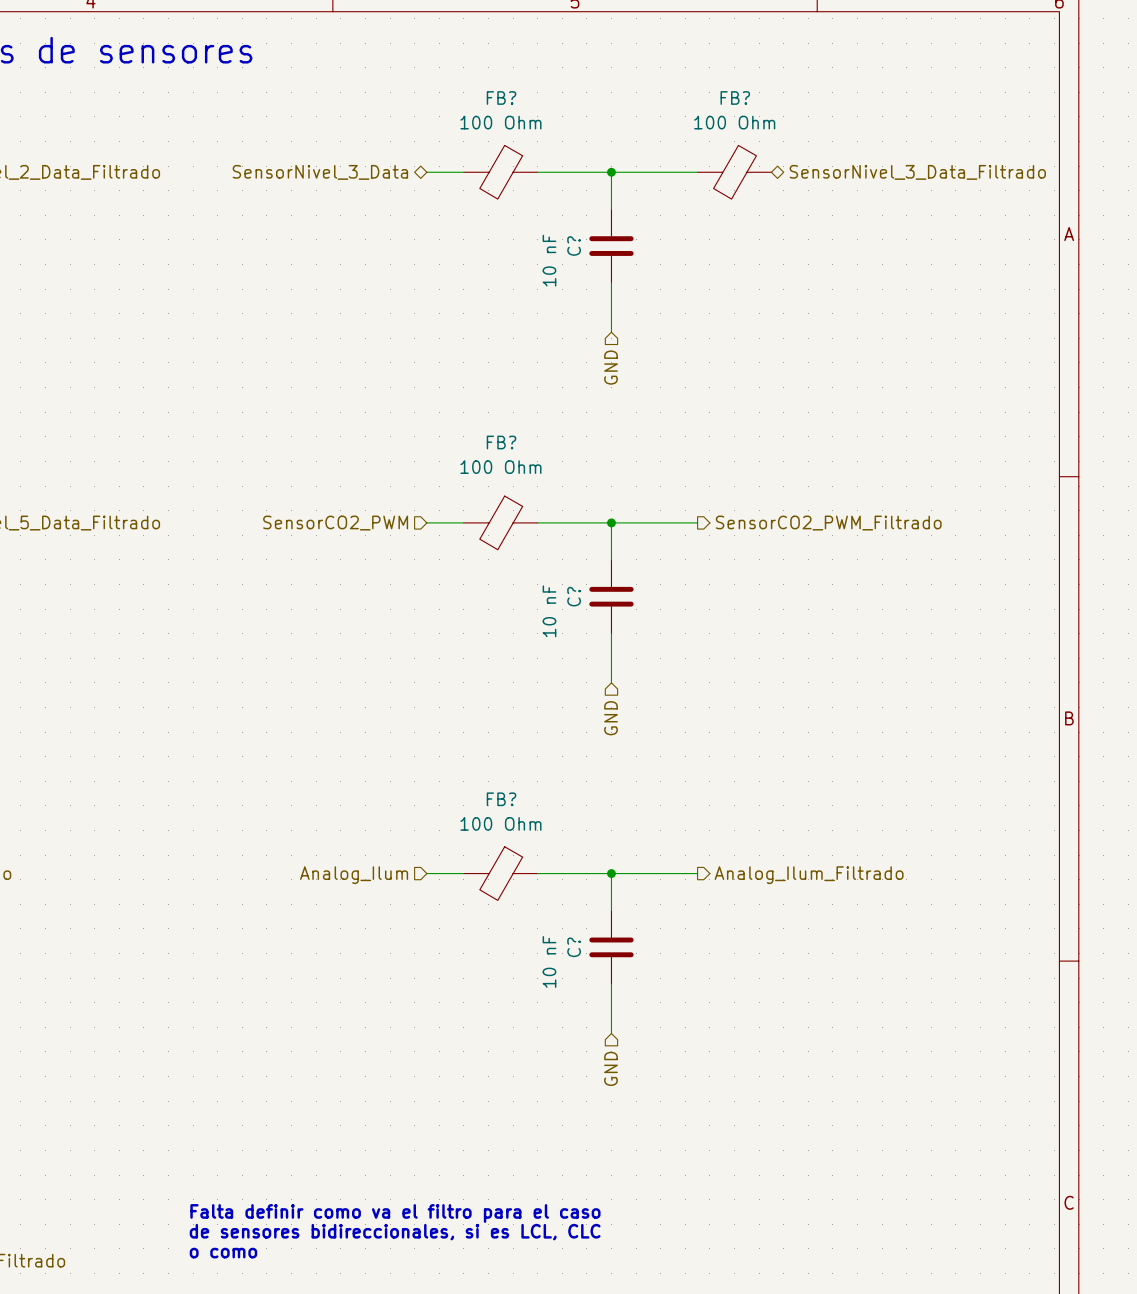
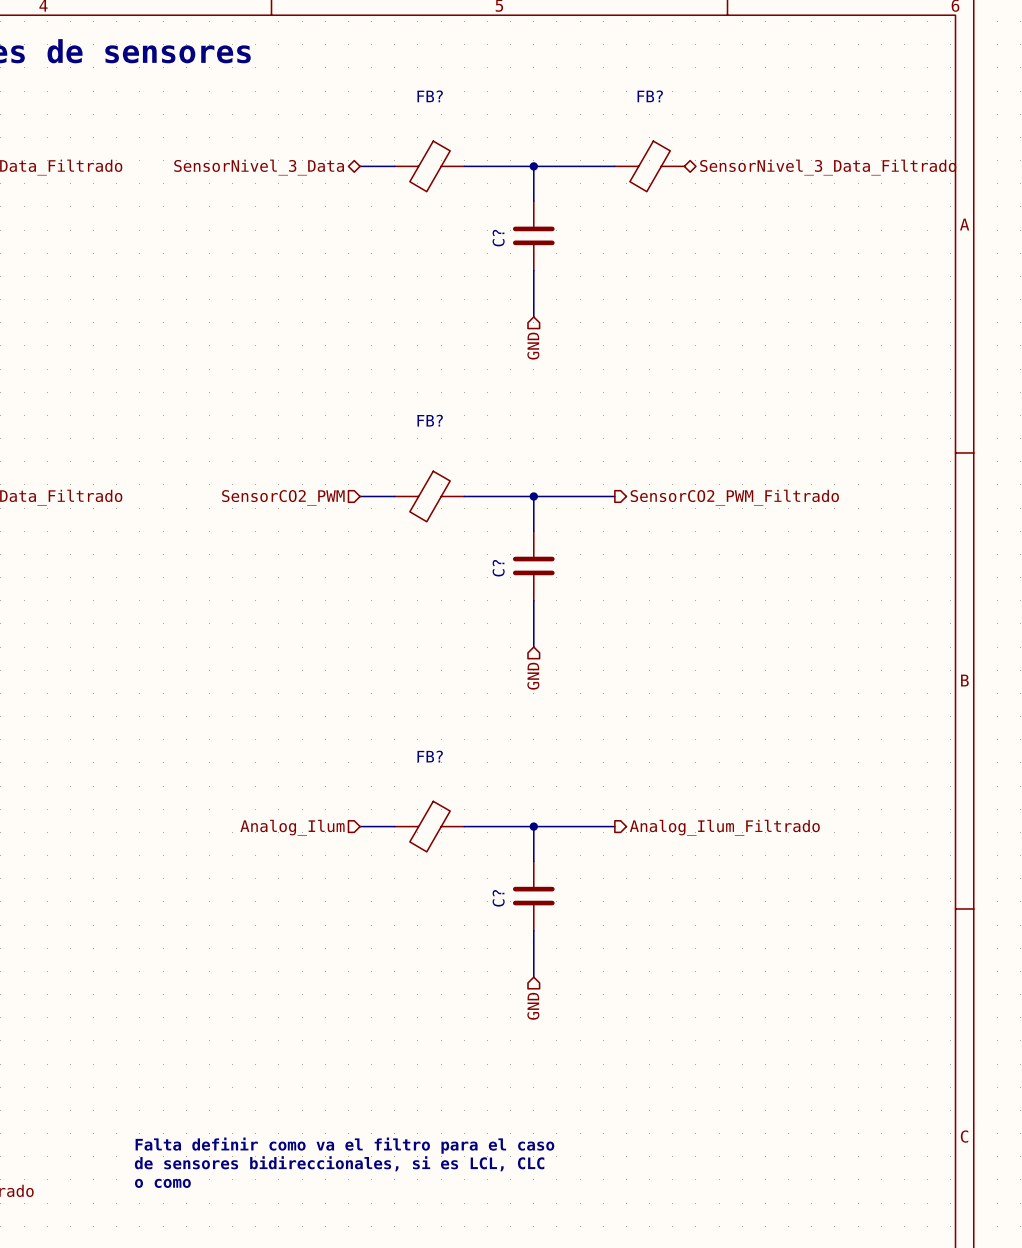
FB? value: 100 Ohm (500, 122) -> none
FB? value: 100 Ohm (734, 122) -> none
C? value: 10 nF (549, 260) -> none
FB? value: 100 Ohm (500, 467) -> none
C? value: 10 nF (549, 611) -> none
FB? value: 100 Ohm (500, 823) -> none
C? value: 10 nF (549, 961) -> none

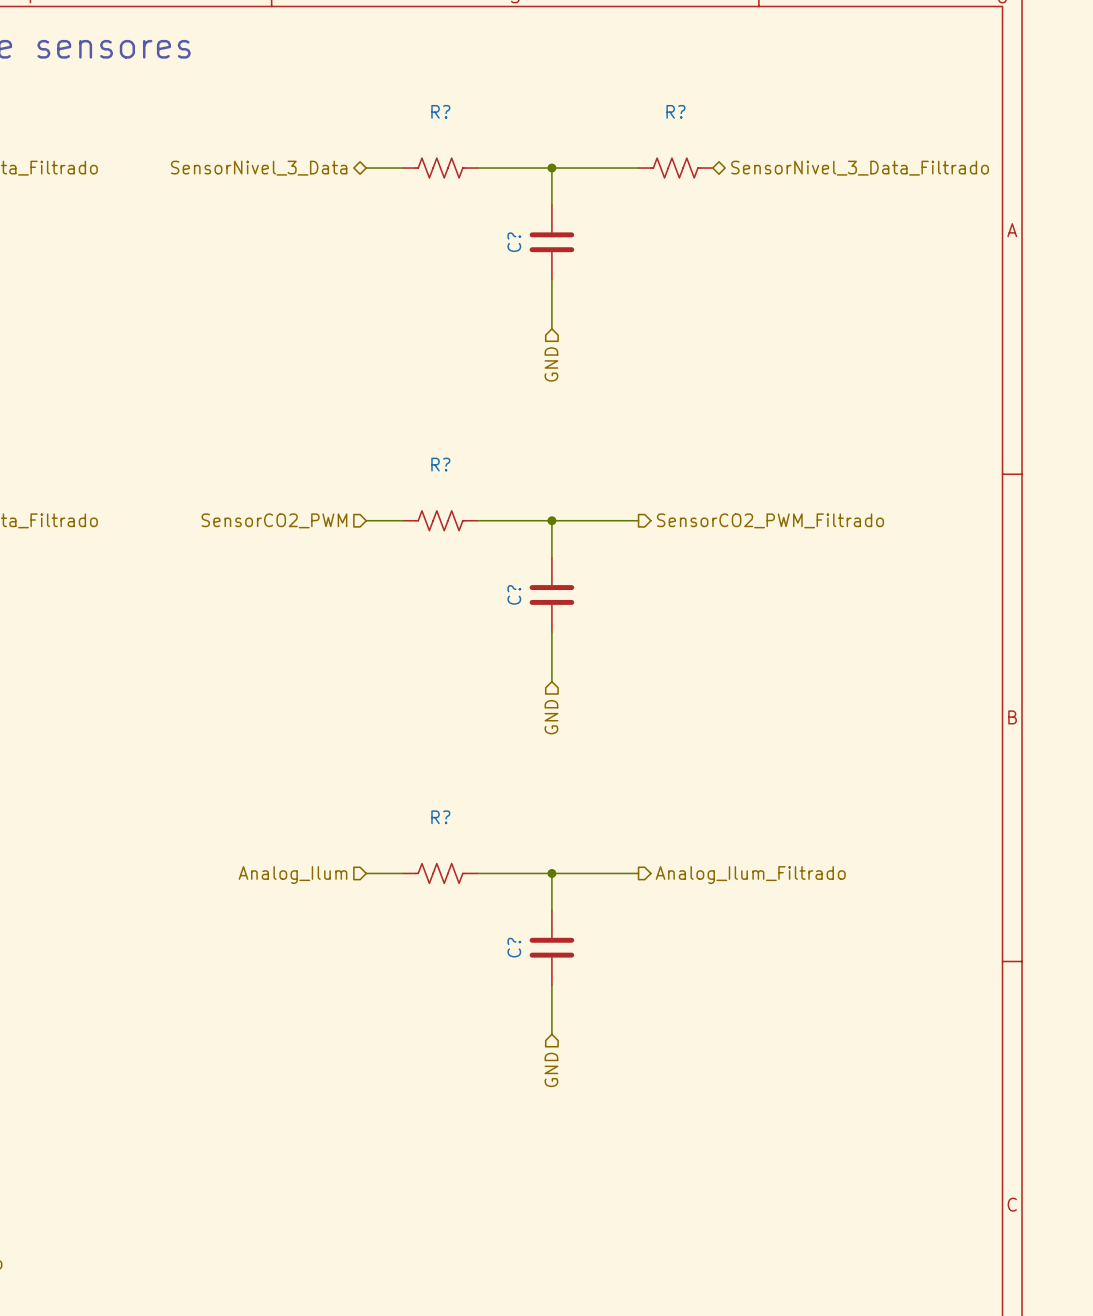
FB?: (429, 166) -> none
R?: none -> (440, 168)
FB?: (649, 166) -> none
R?: none -> (675, 168)
FB?: (429, 496) -> none
R?: none -> (440, 520)
FB?: (429, 826) -> none
R?: none -> (440, 873)
text: Falta definir como va el filtro para el caso (344, 1145) -> none
text: de sensores bidireccionales, si es LCL, CLC (339, 1163) -> none
text: o como (162, 1183) -> none

